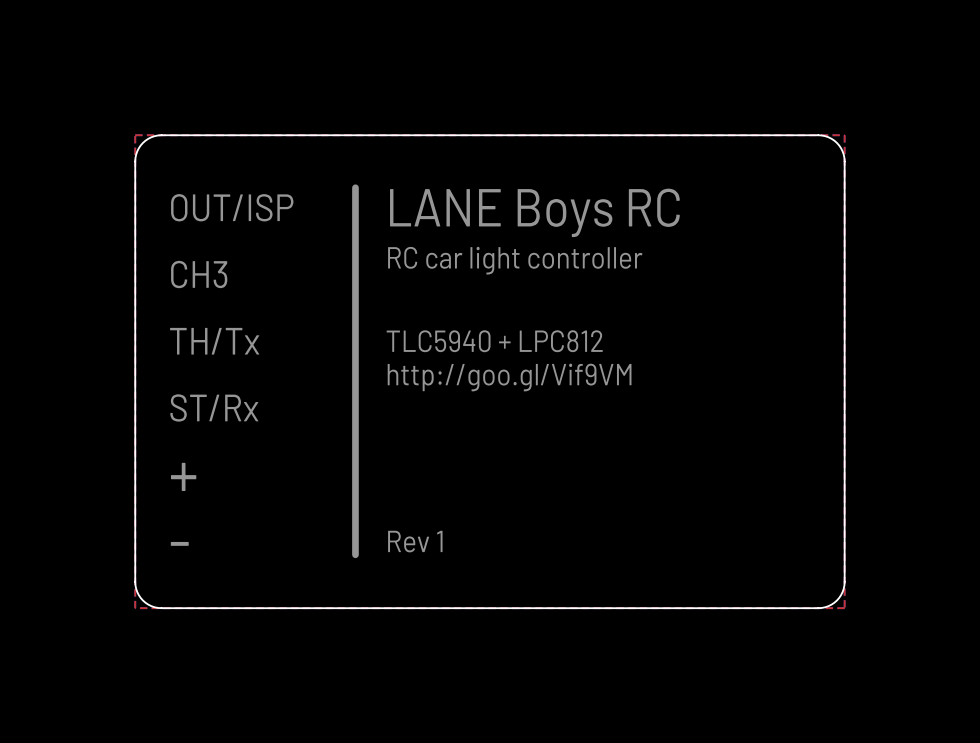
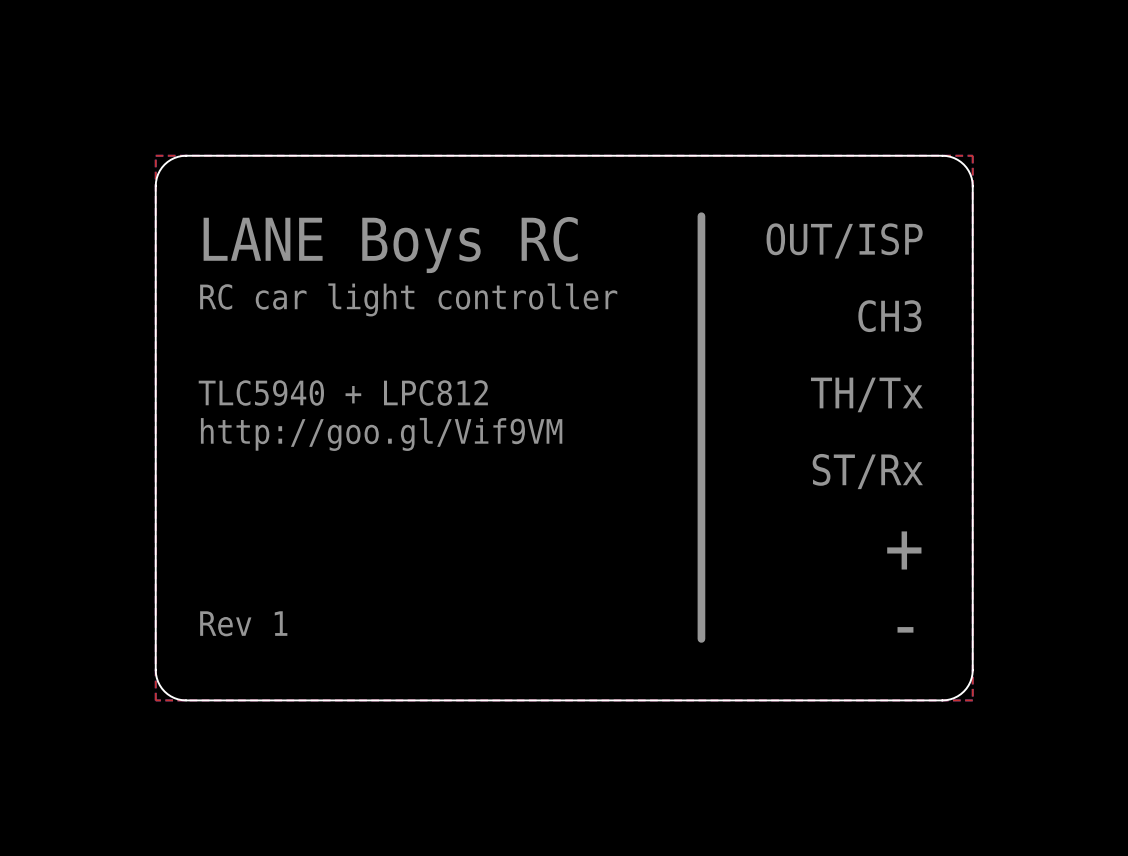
line: (355, 187) (355, 554) -> (701, 216) (701, 638)
text position: OUT/ISP (232, 207) -> OUT/ISP (844, 240)
text position: LANE Boys RC (534, 212) -> LANE Boys RC (390, 245)
text position: RC car light controller (515, 260) -> RC car light controller (408, 299)
text position: CH3 (199, 274) -> CH3 (889, 316)
text position: TH/Tx (214, 341) -> TH/Tx (866, 394)
text position: TLC5940 + LPC812 (494, 341) -> TLC5940 + LPC812 (343, 393)
text position: http://goo.gl/Vif9VM (509, 377) -> http://goo.gl/Vif9VM (381, 434)
text position: ST/Rx (214, 407) -> ST/Rx (867, 471)
text position: + (183, 476) -> + (904, 550)
text position: Rev 1 (415, 541) -> Rev 1 (243, 623)
text position: - (179, 543) -> - (905, 629)

